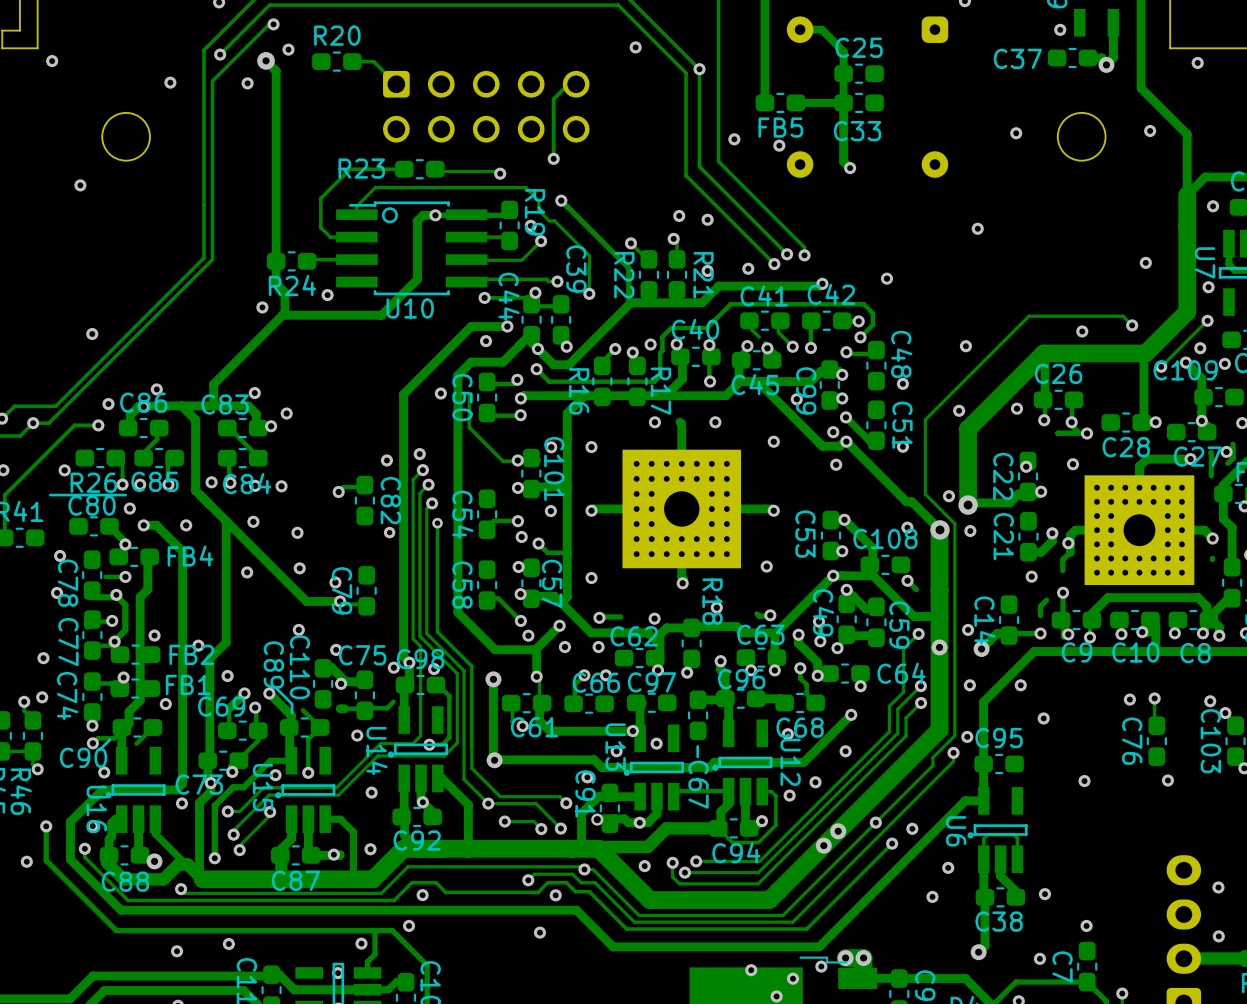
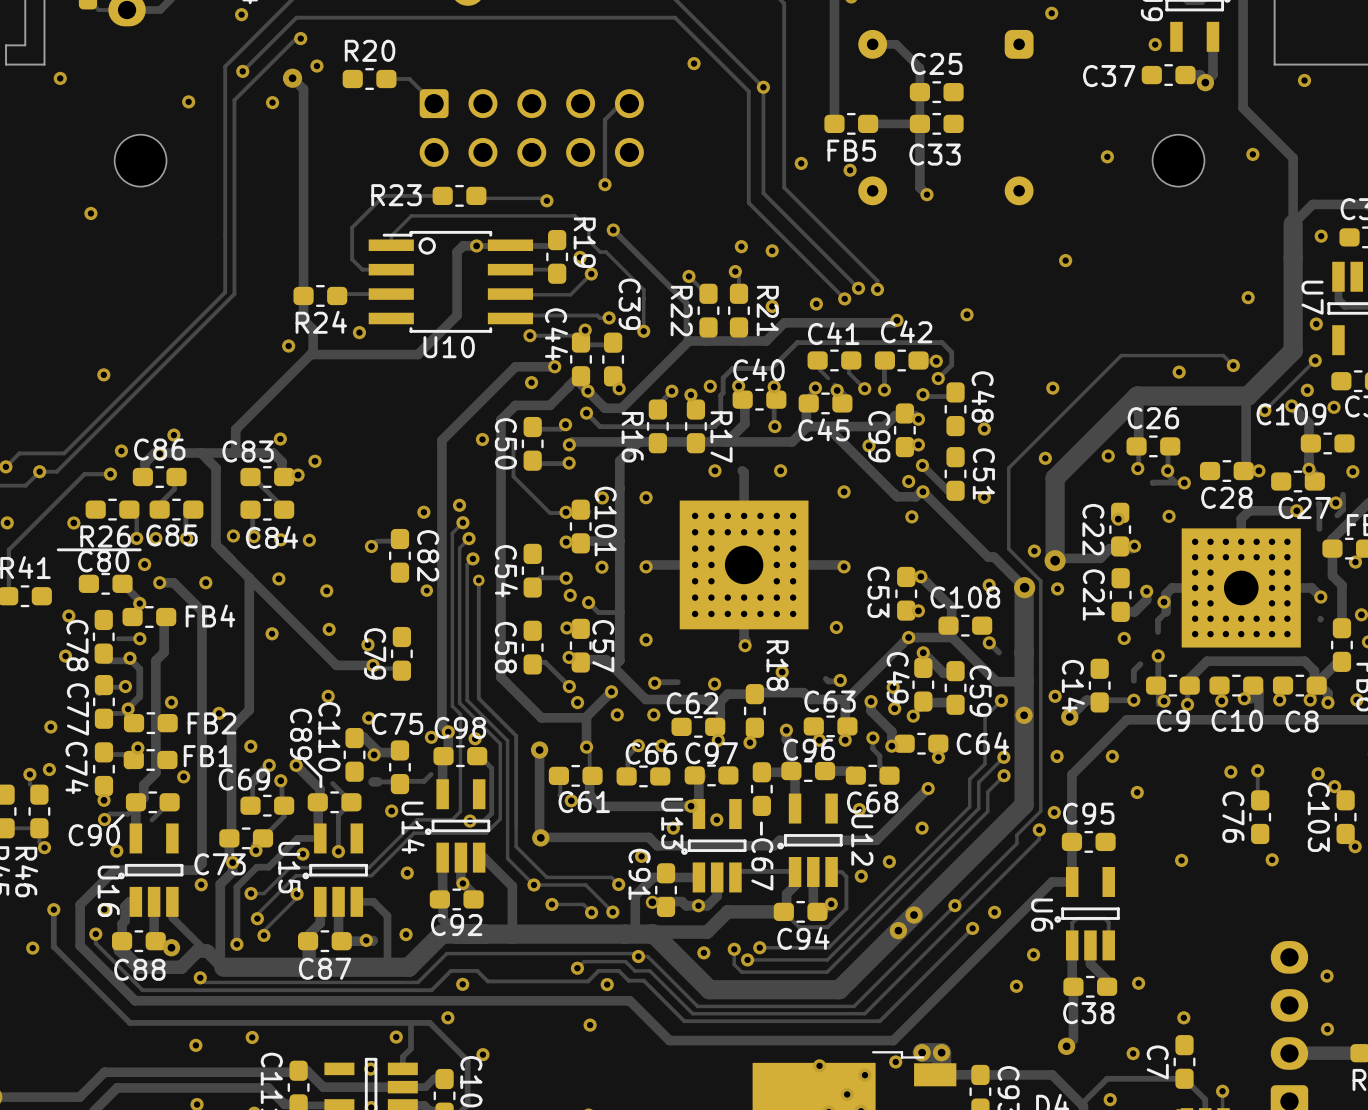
via: none -> (482, 1054)

